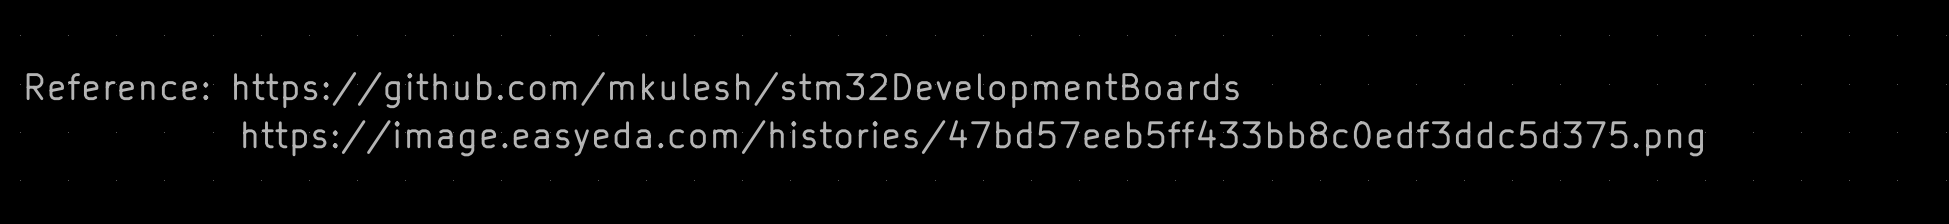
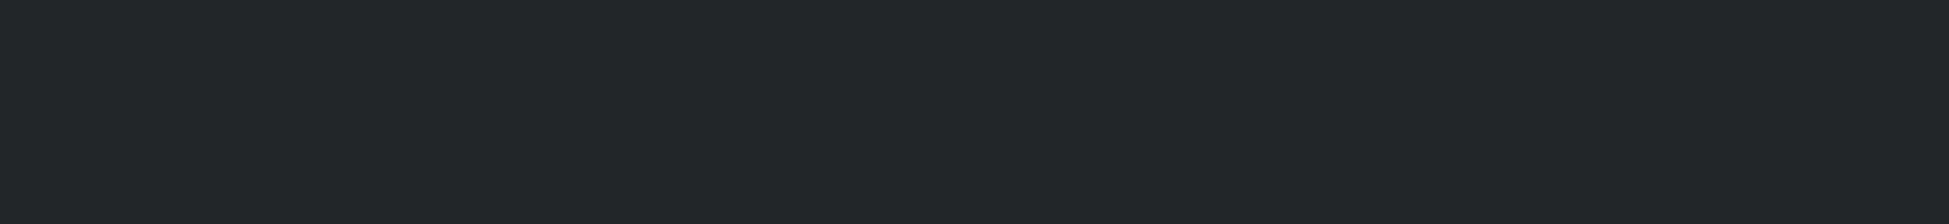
label: Reference: https://github.com/mkulesh/stm32DevelopmentBoards (632, 90) -> none
label: https://image.easyeda.com/histories/47bd57eeb5ff433bb8c0edf3ddc5d375.png (973, 138) -> none

